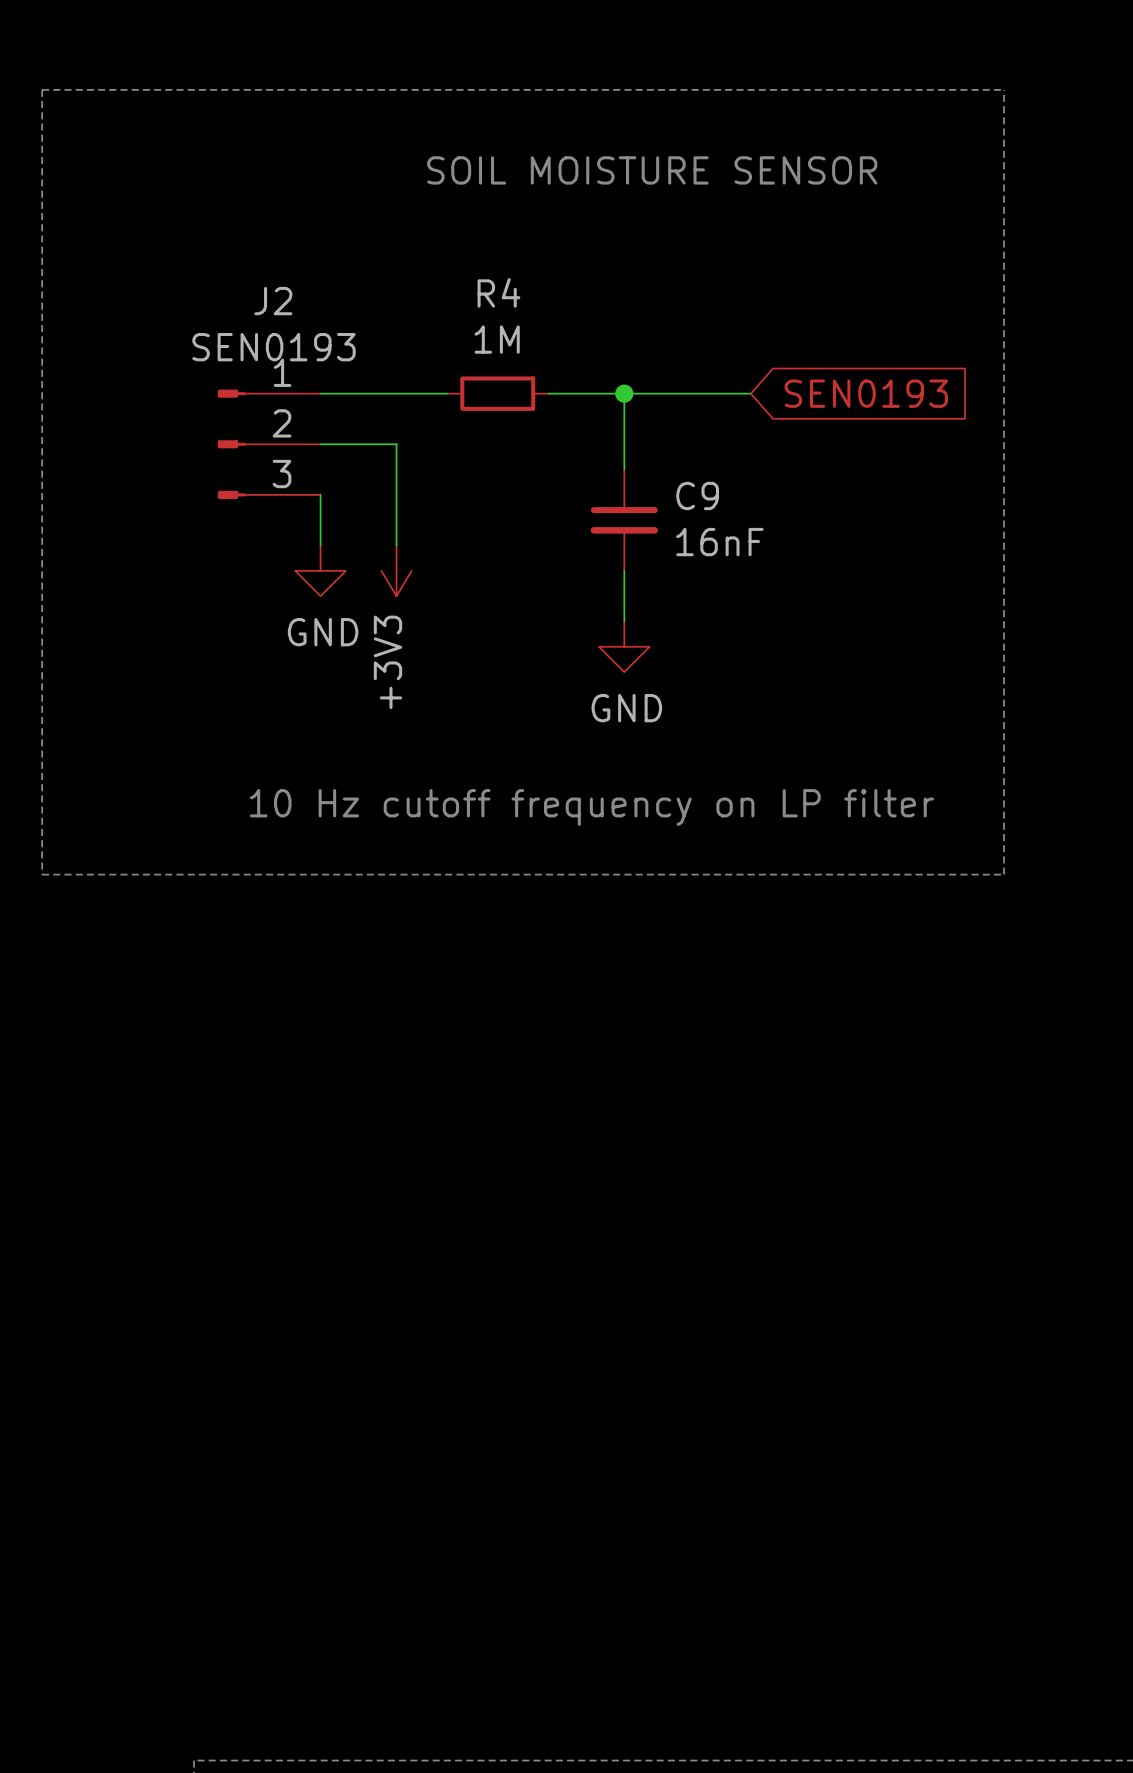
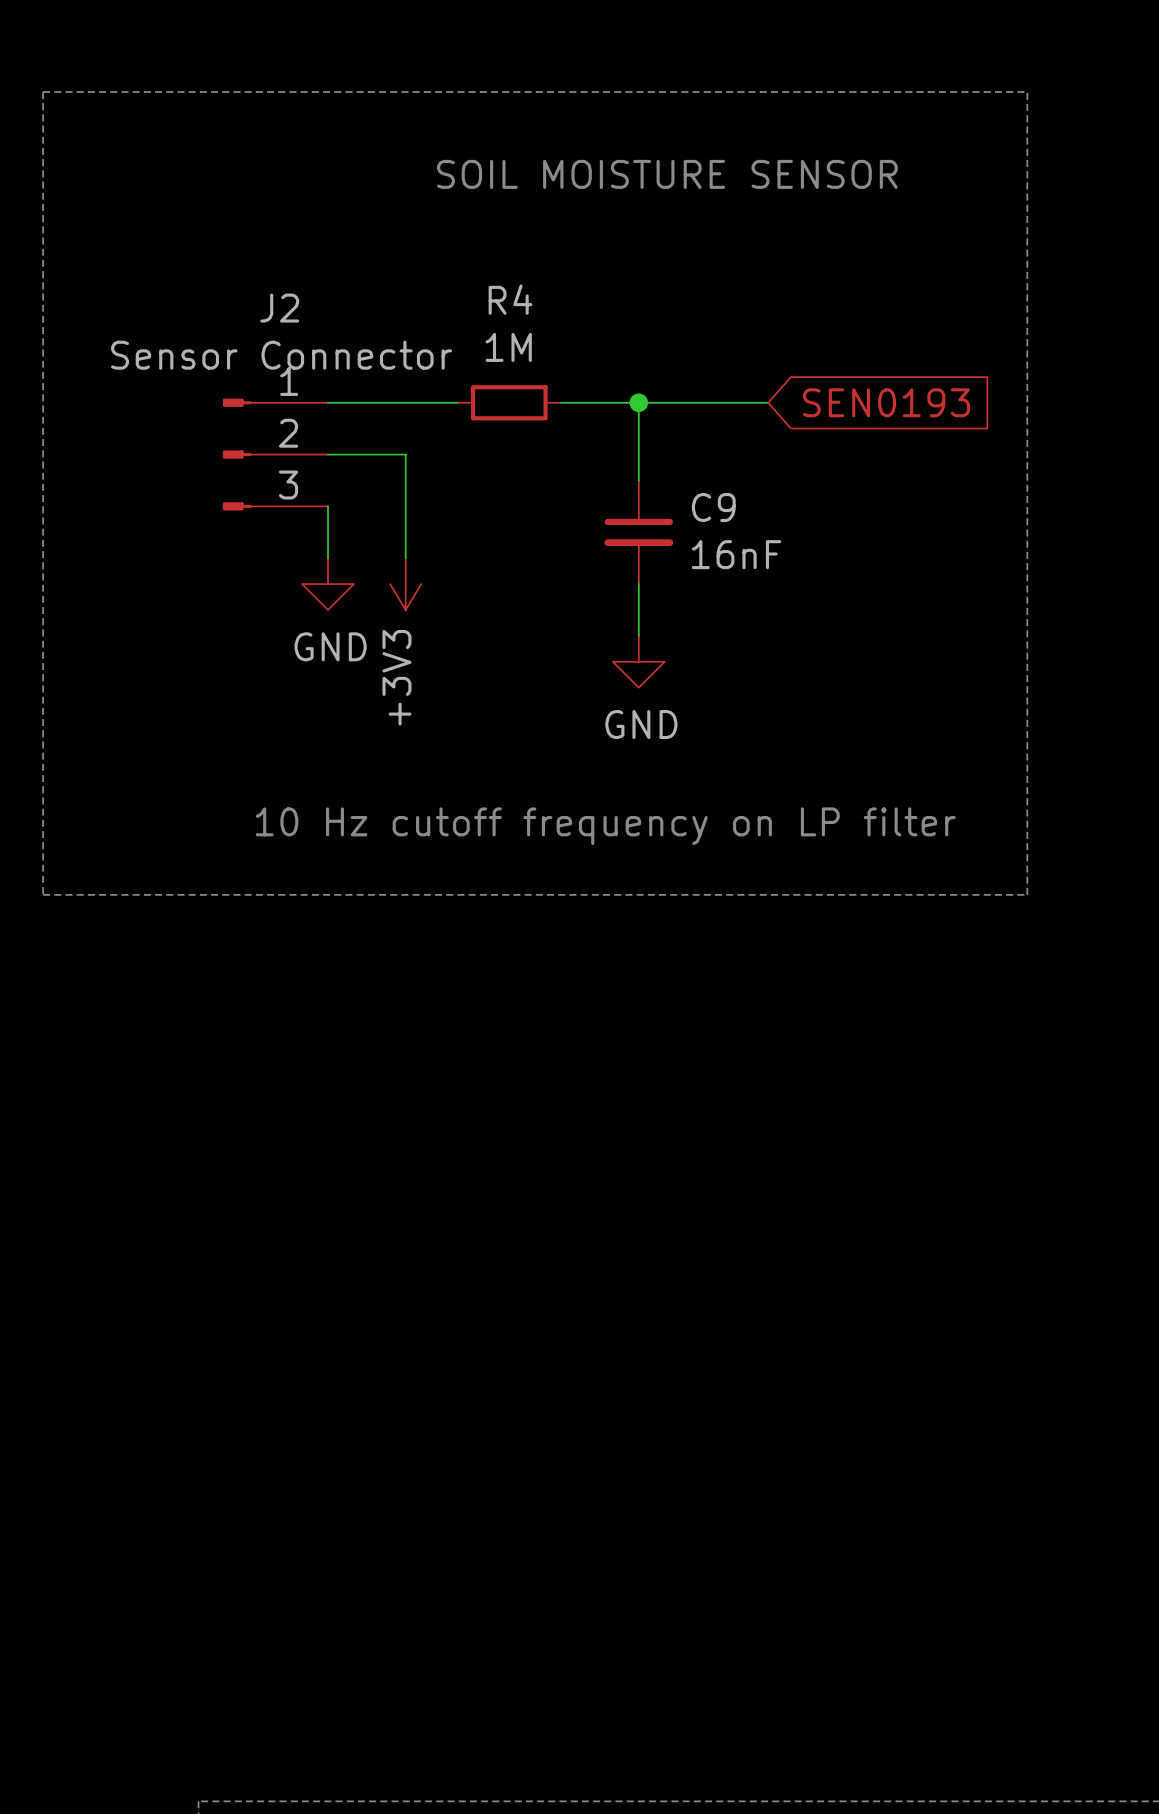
J2 value: SEN0193 (273, 347) -> Sensor Connector (281, 355)

